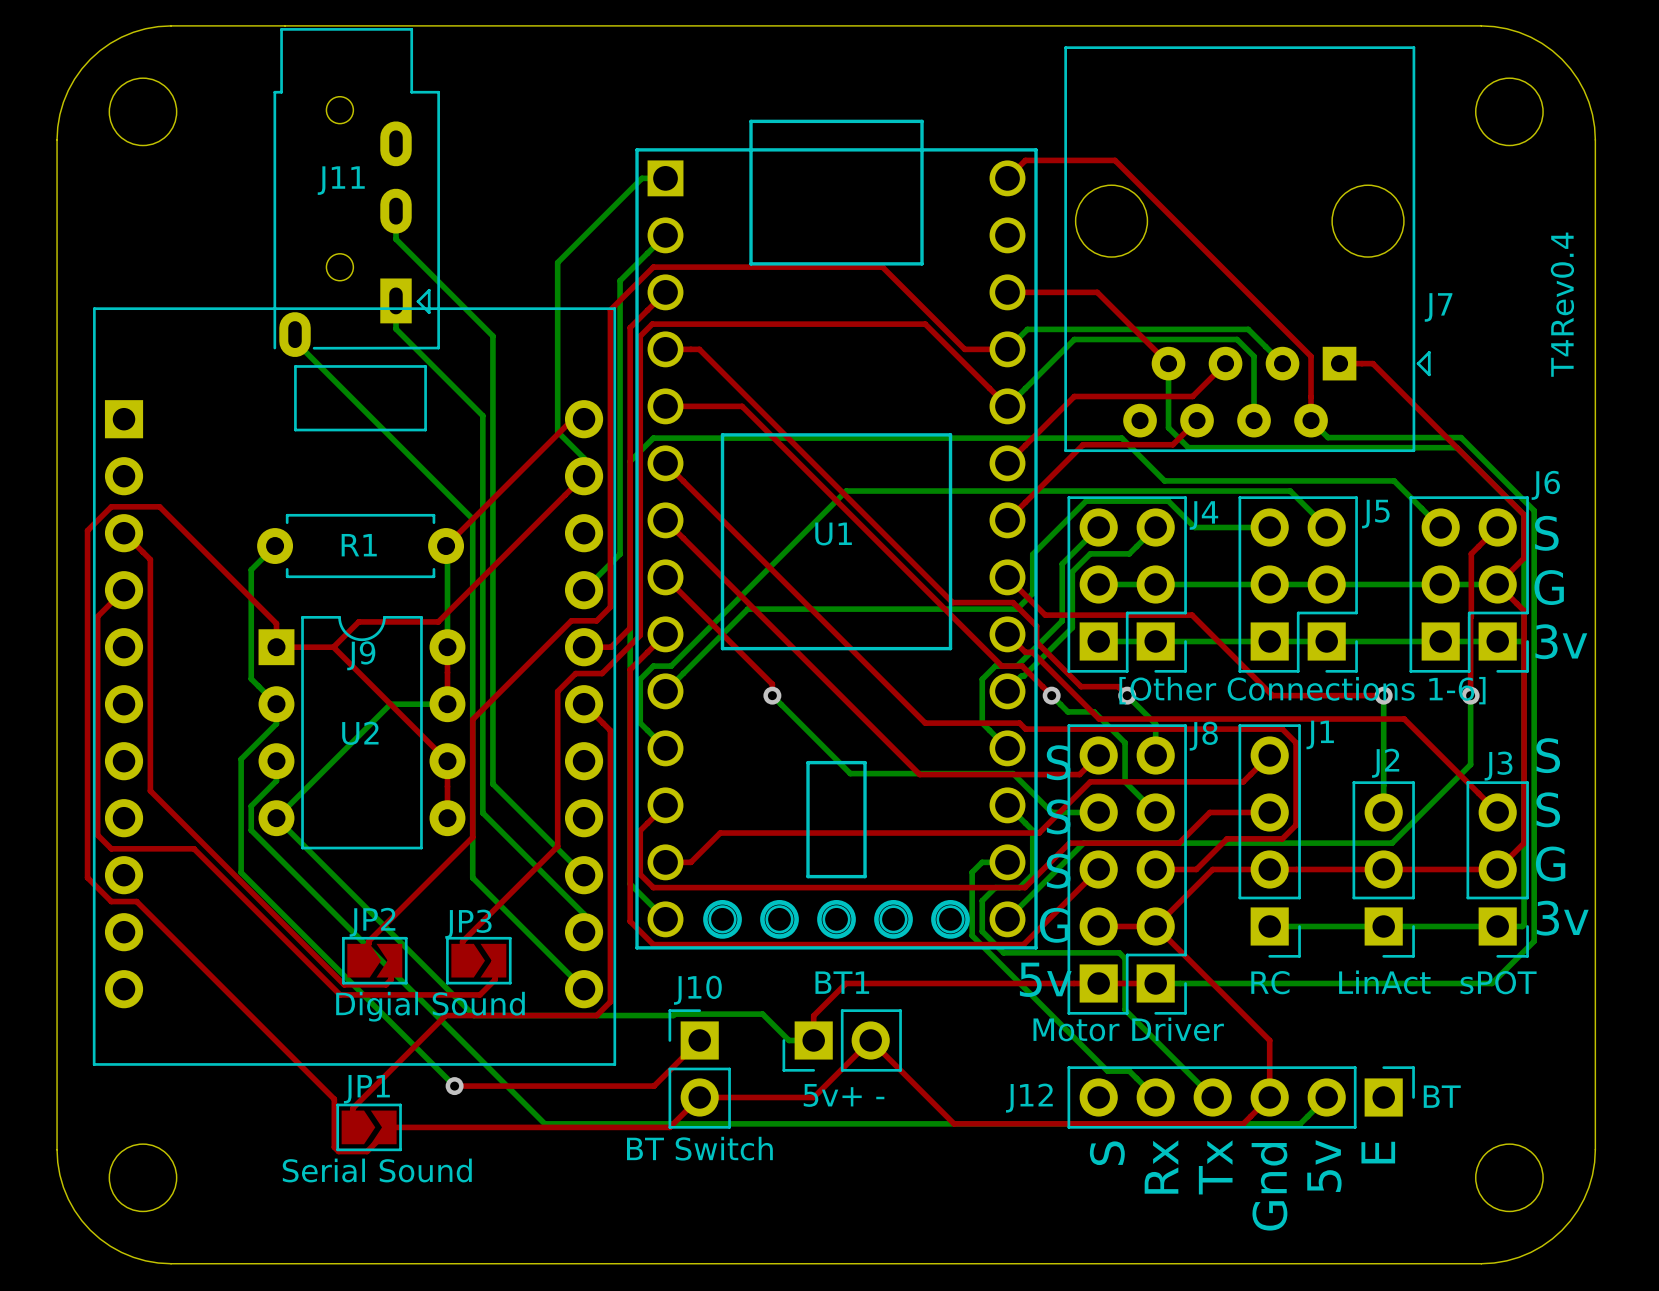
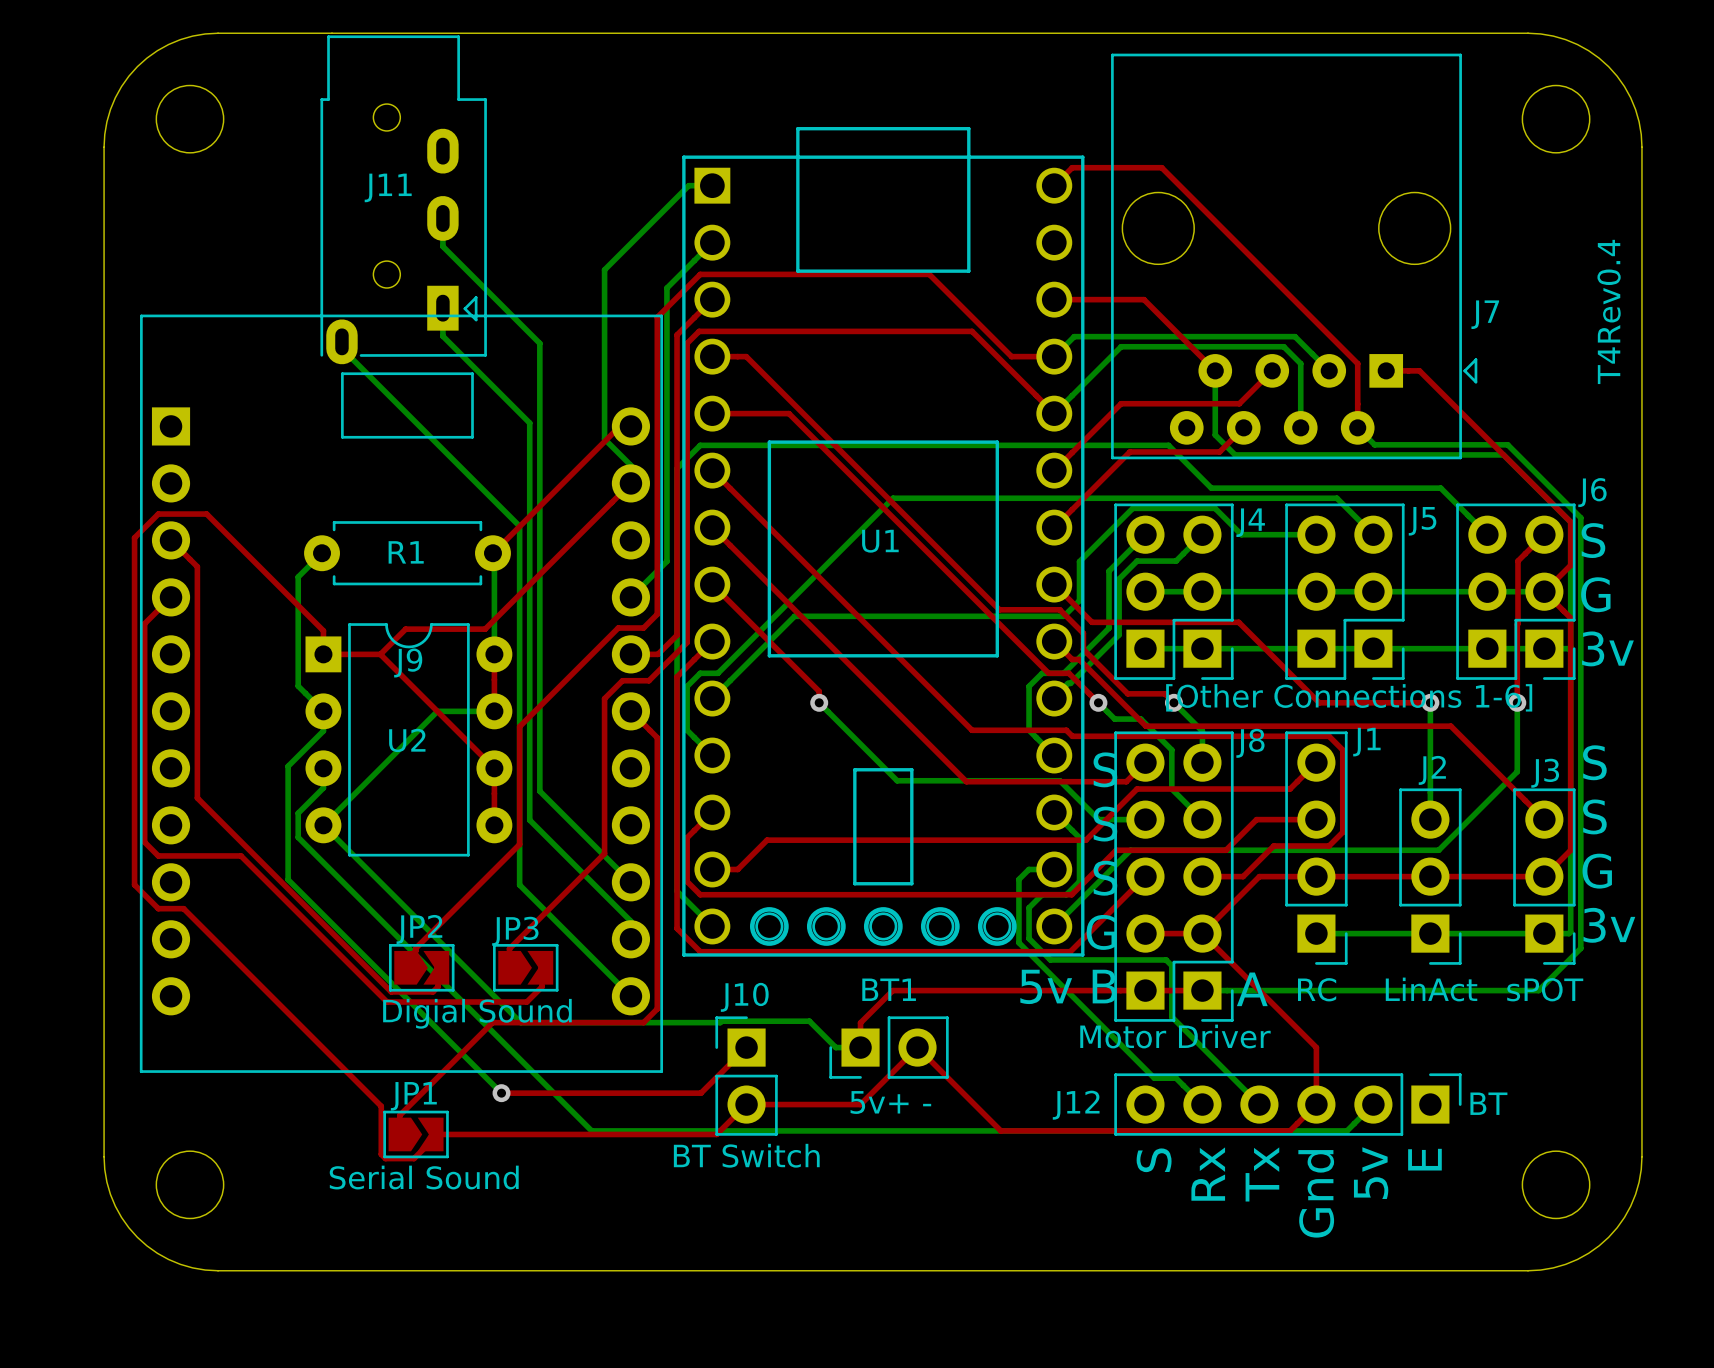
text: 5v (1045, 979) -> 5v B (1068, 986)
text: none -> A (1252, 989)

